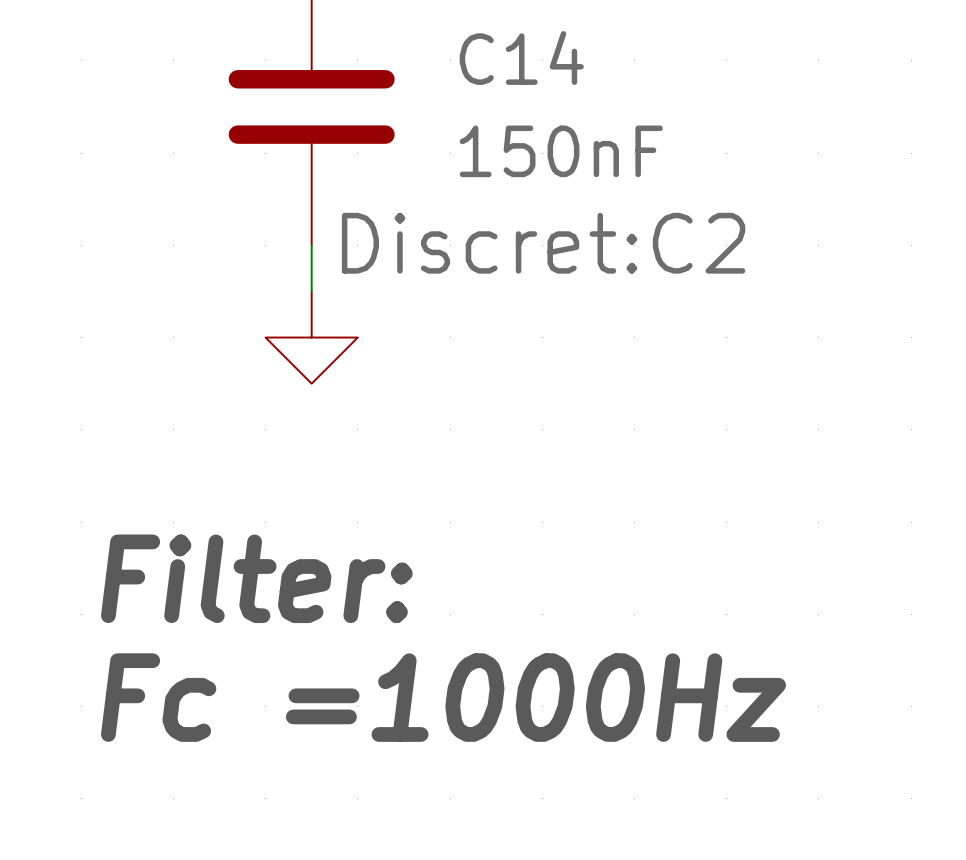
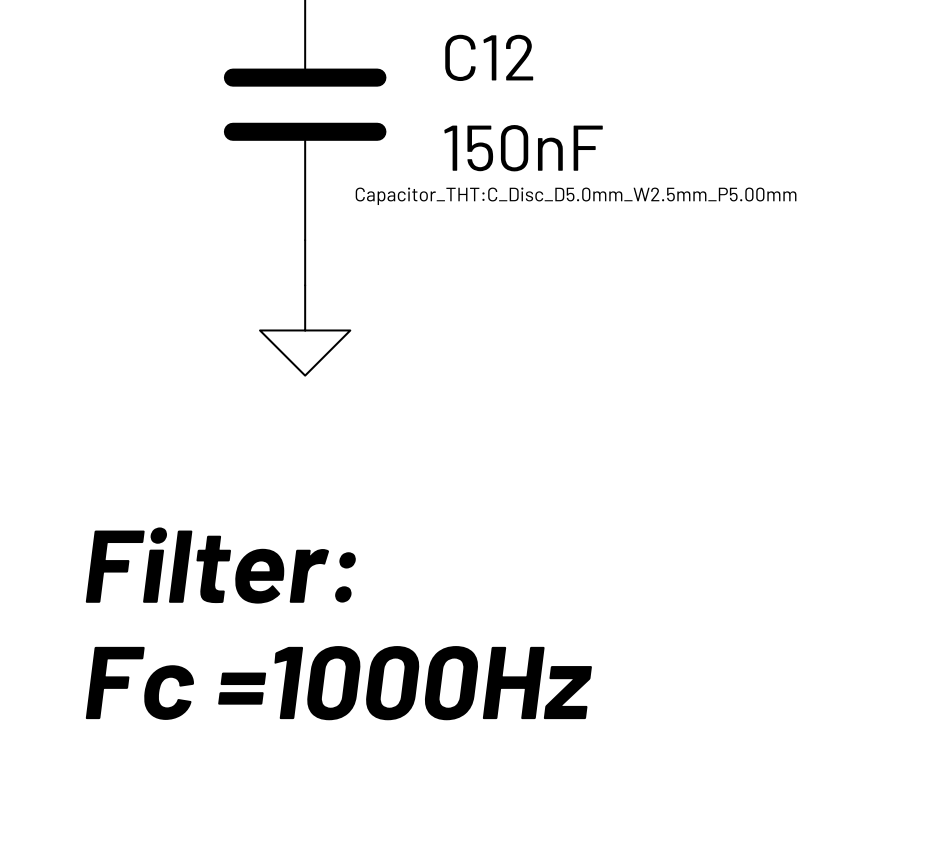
C14 name: C14 (521, 58) -> C12 (489, 57)
C14 text: Discret:C2 (543, 243) -> Capacitor_THT:C_Disc_D5.0mm_W2.5mm_P5.00mm (576, 196)

